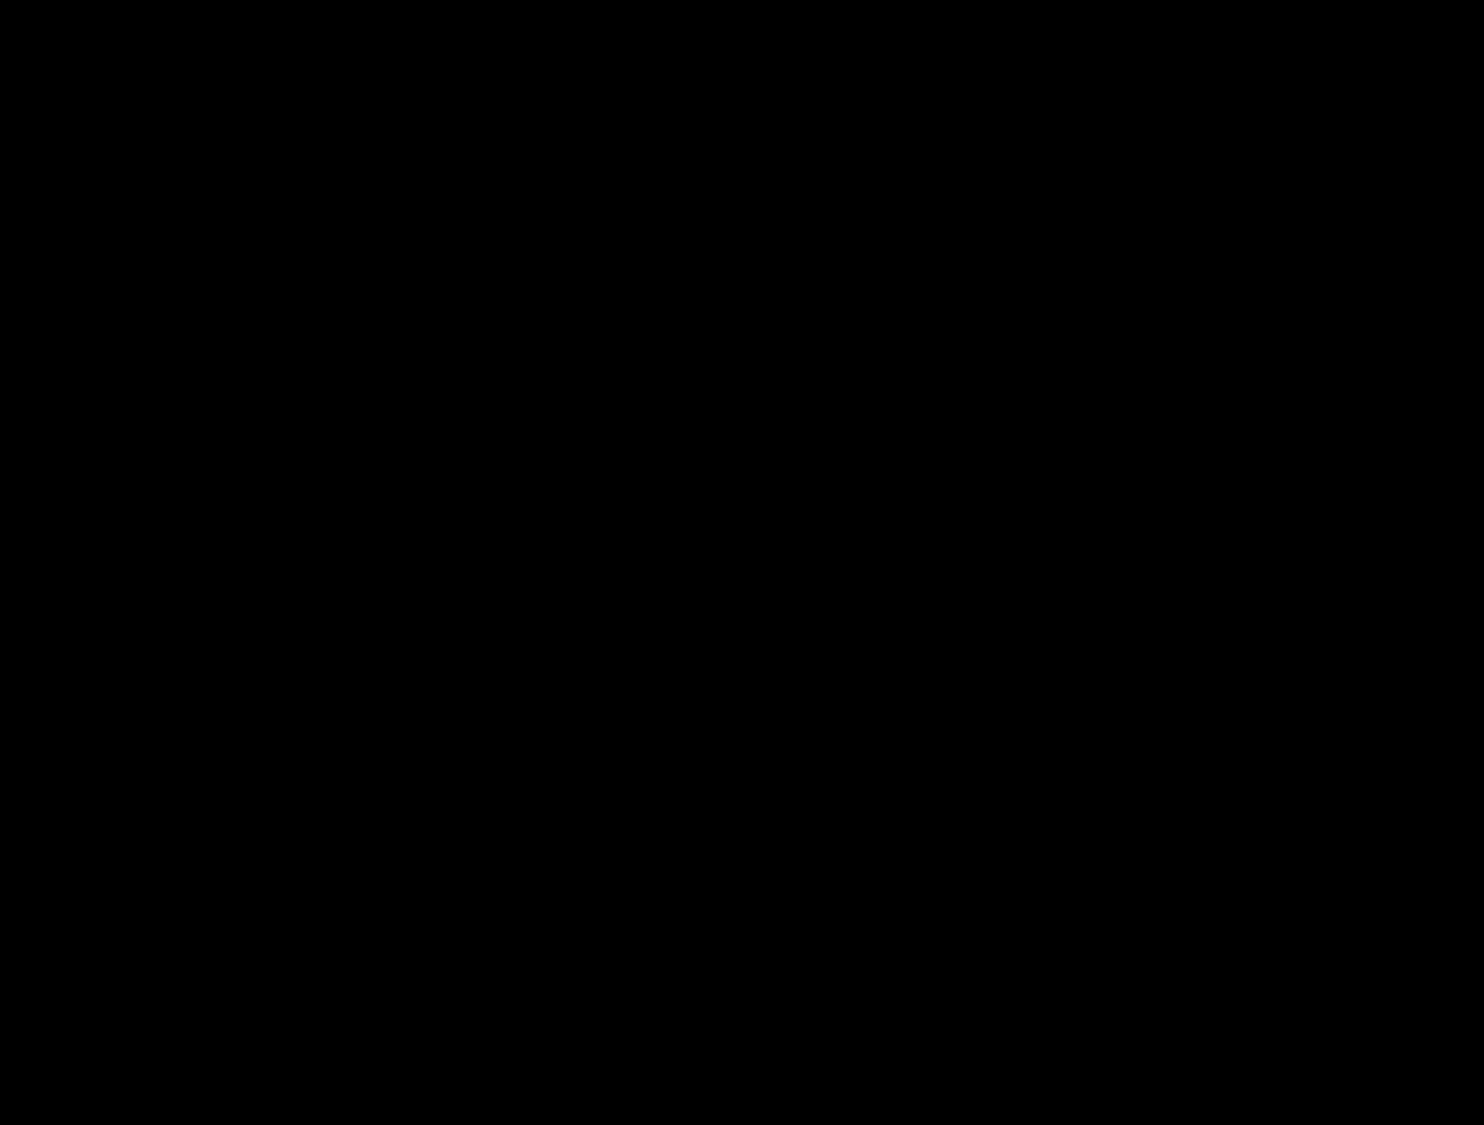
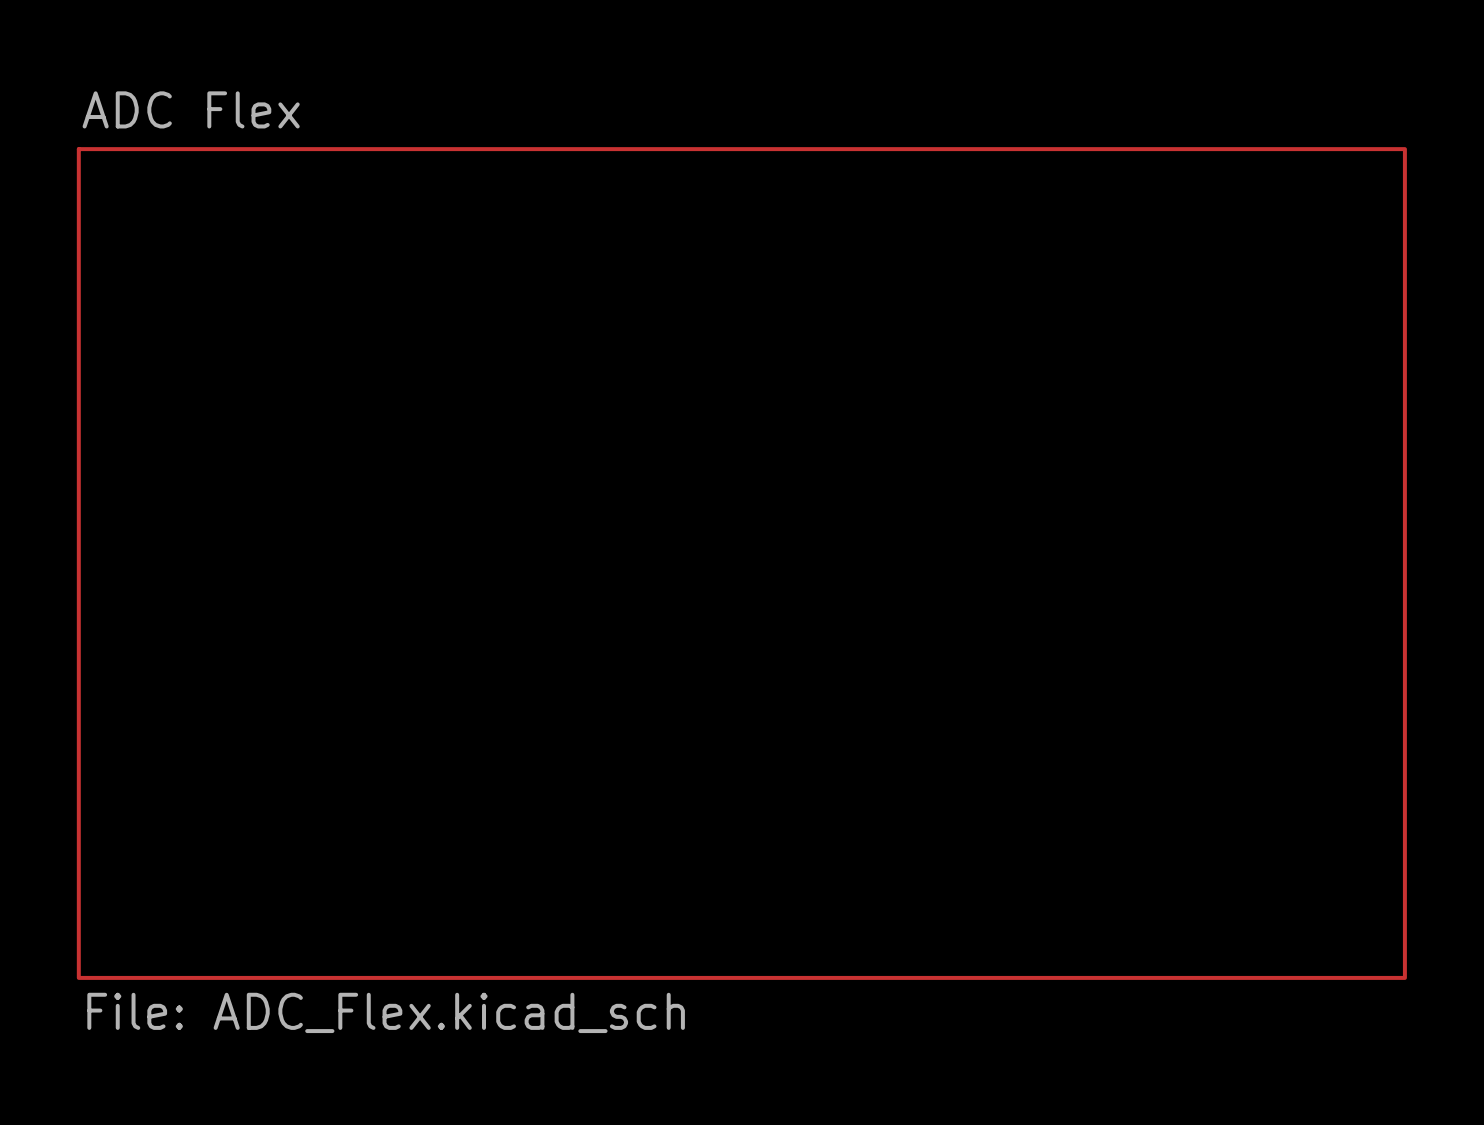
sheet ADC Flex: none -> File: ADC_Flex.kicad_sch (741, 563)

